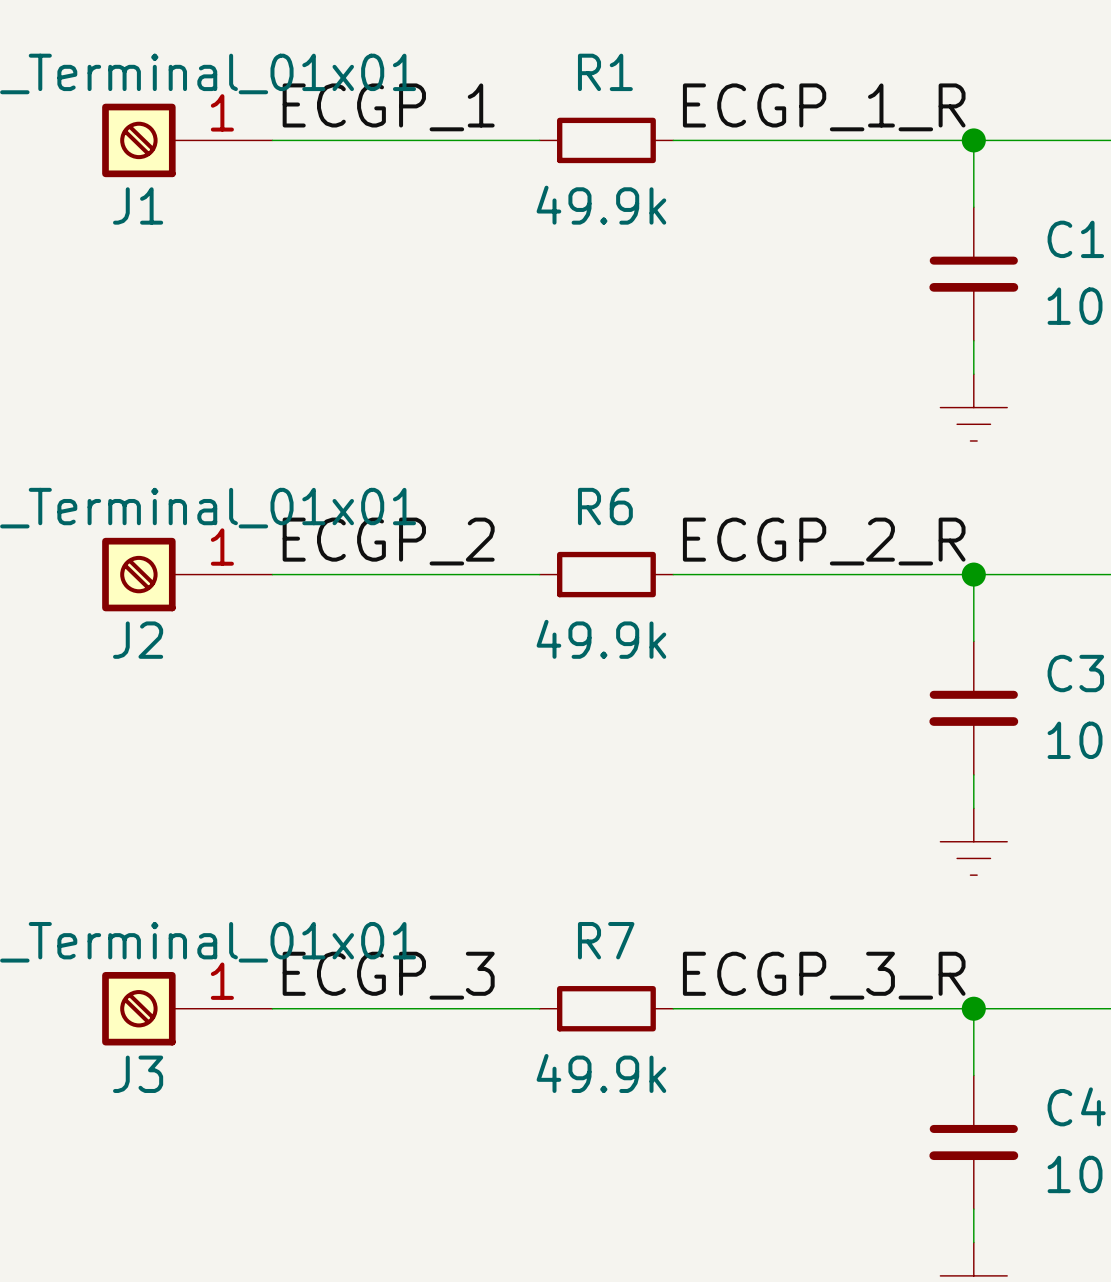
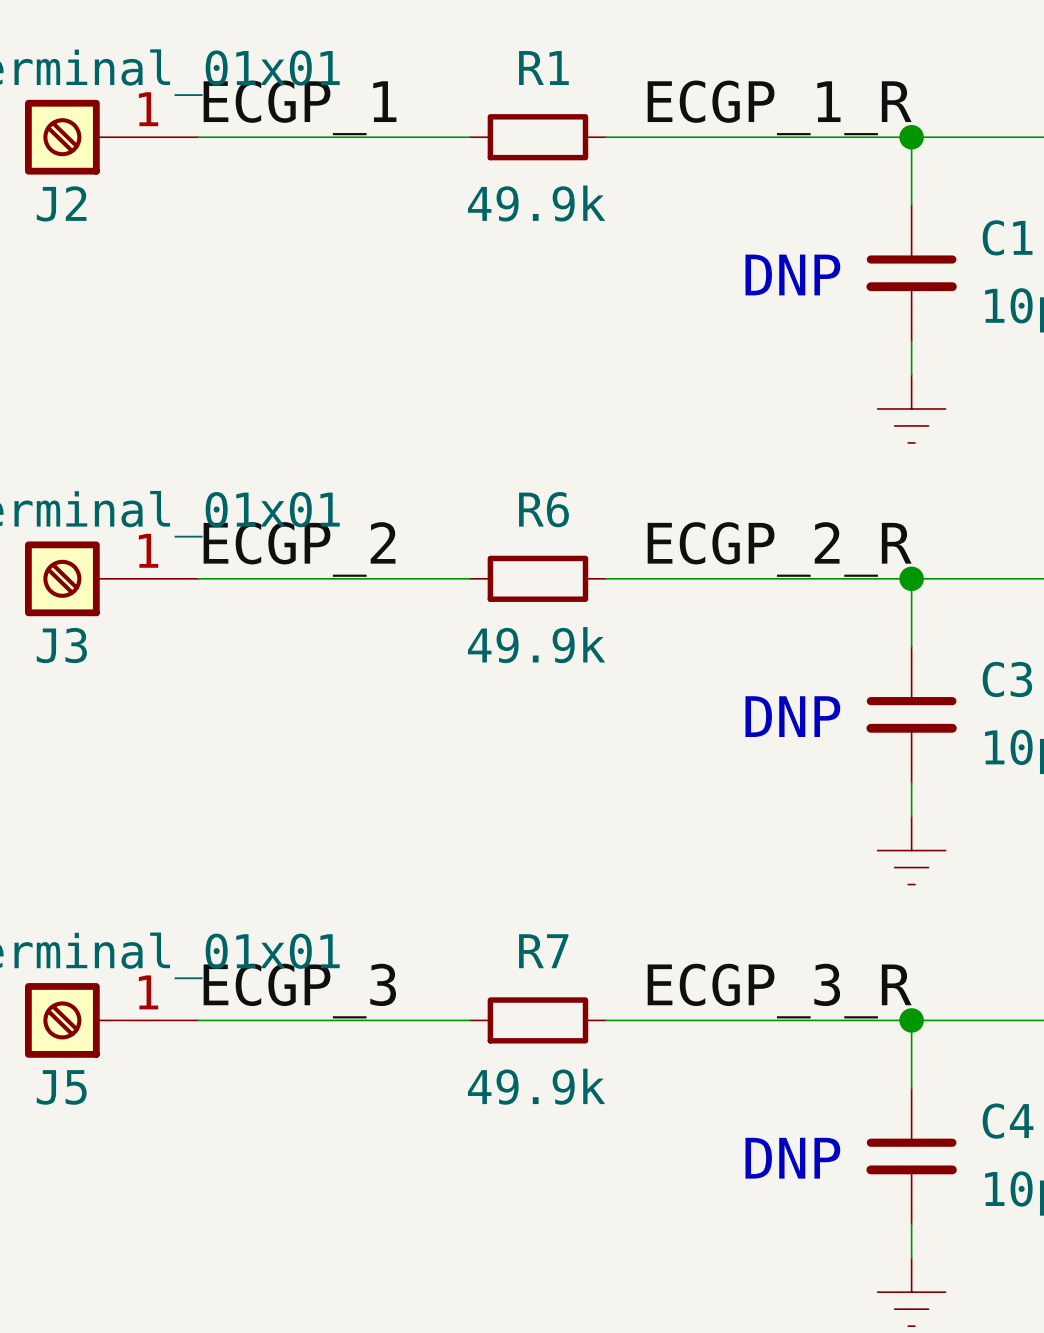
J1 name: J1 (138, 205) -> J2 (61, 203)
text: none -> DNP (792, 275)
J2 name: J2 (138, 640) -> J3 (61, 645)
text: none -> DNP (792, 716)
J3 name: J3 (138, 1074) -> J5 (61, 1087)
text: none -> DNP (792, 1158)

